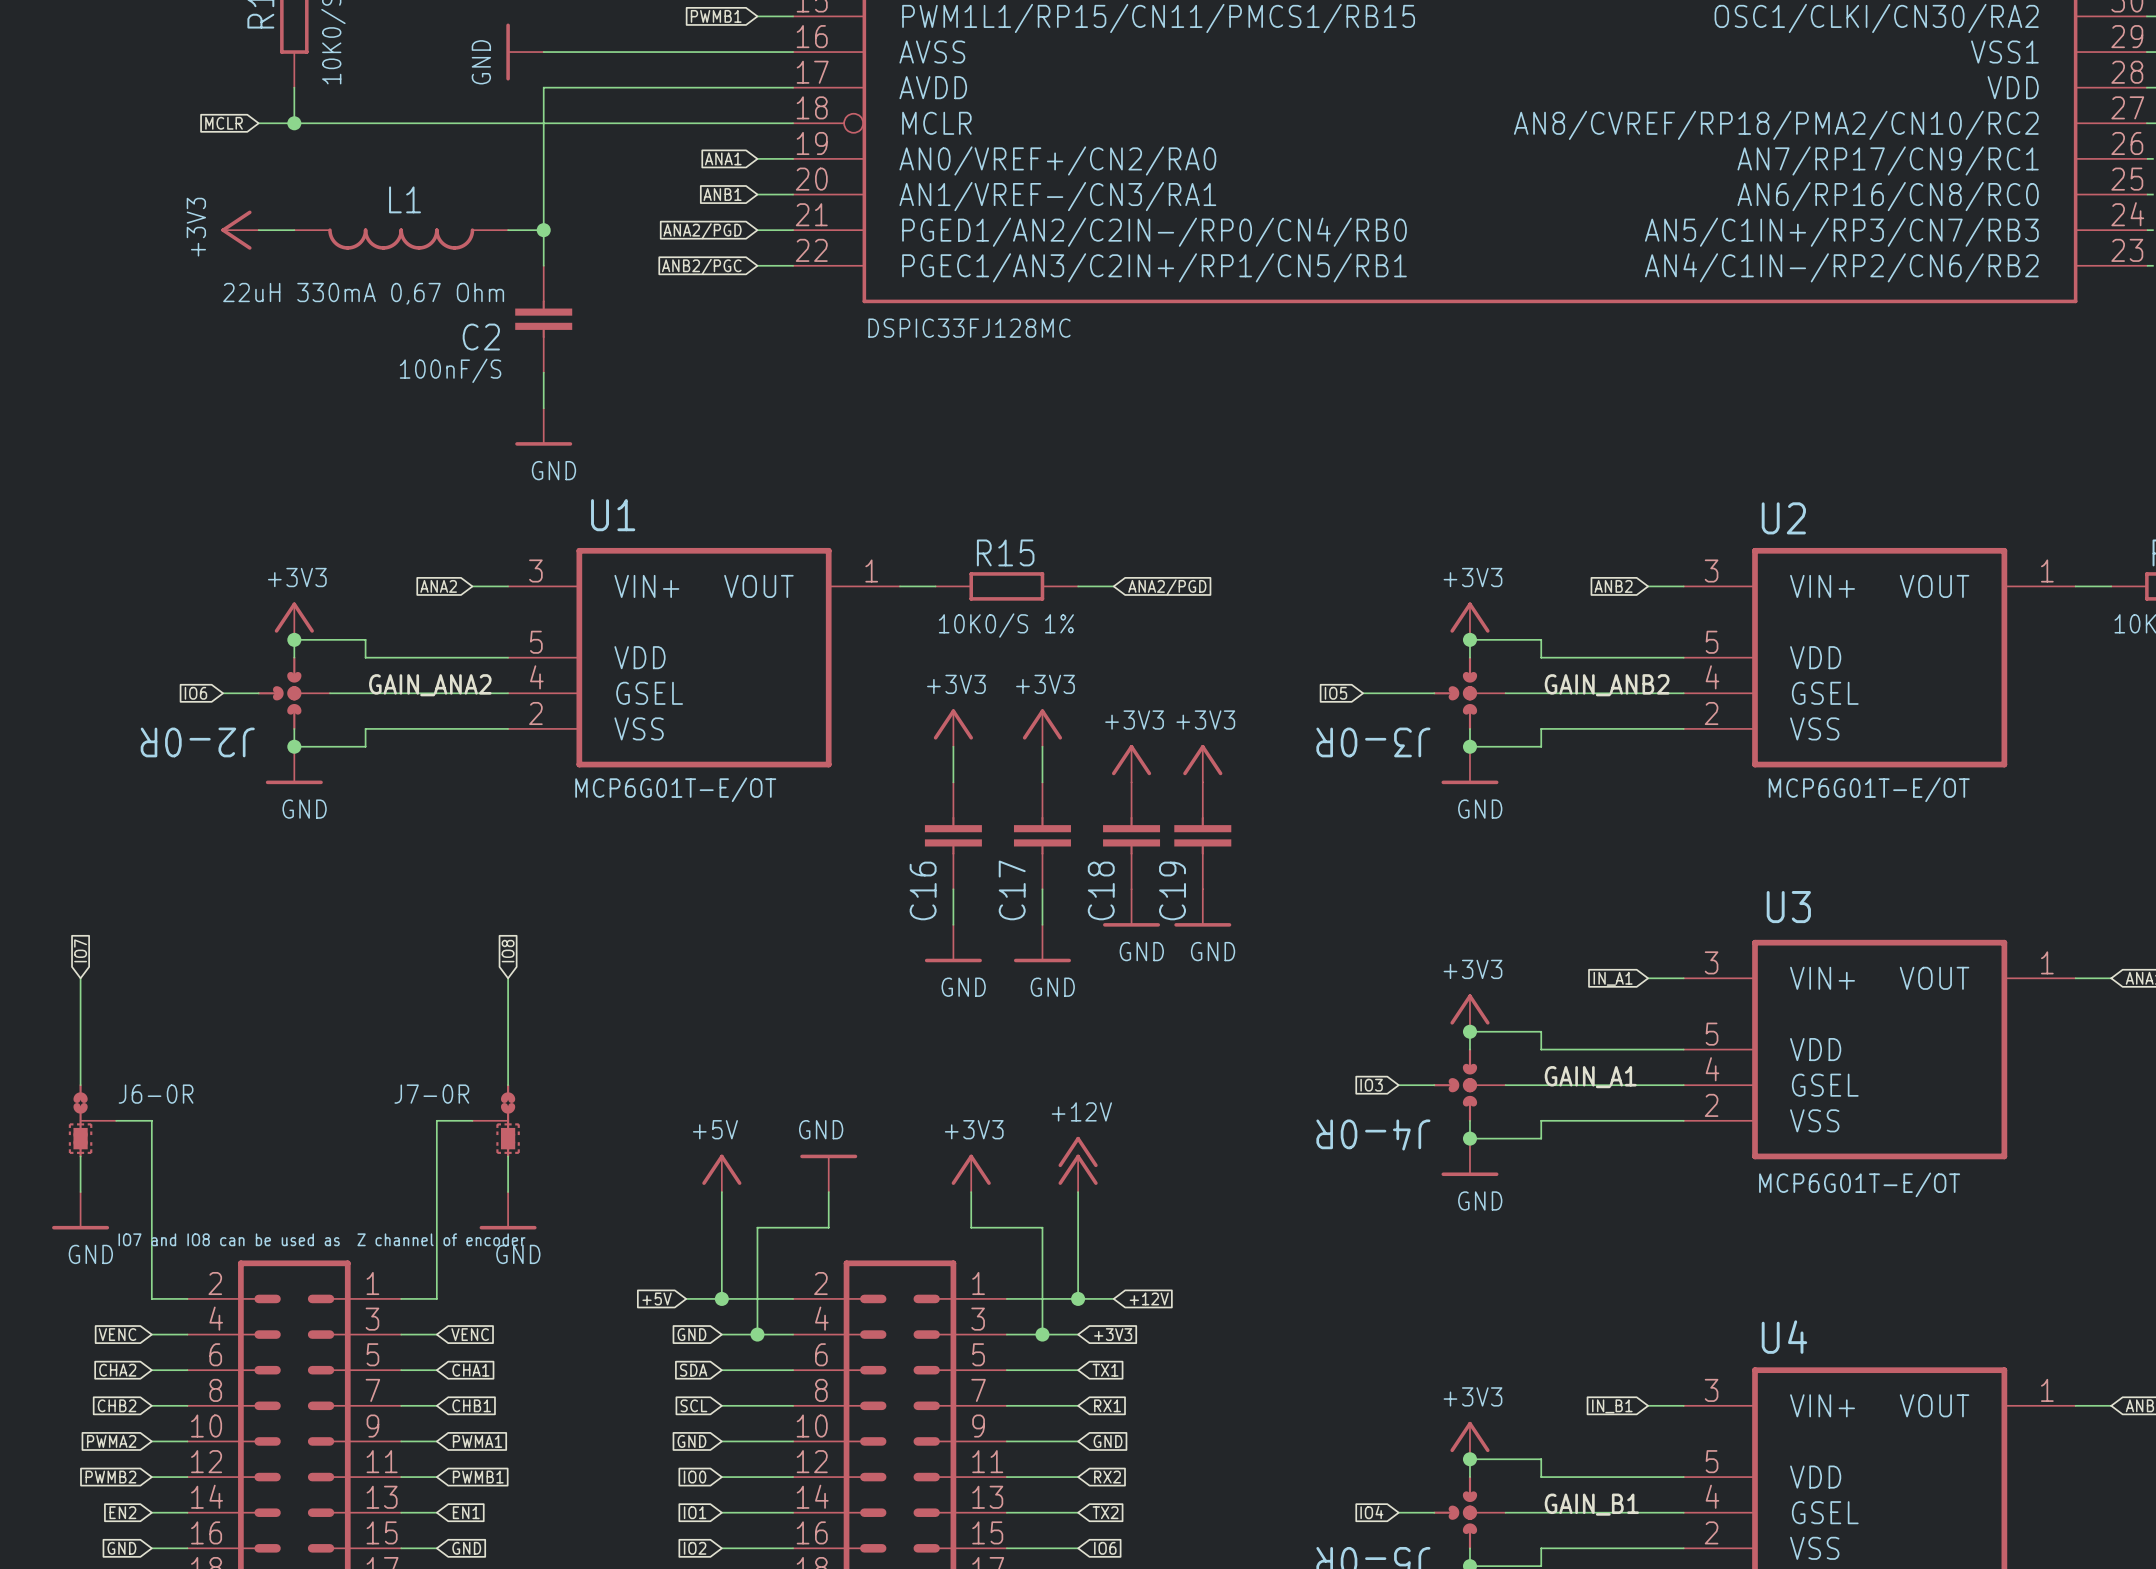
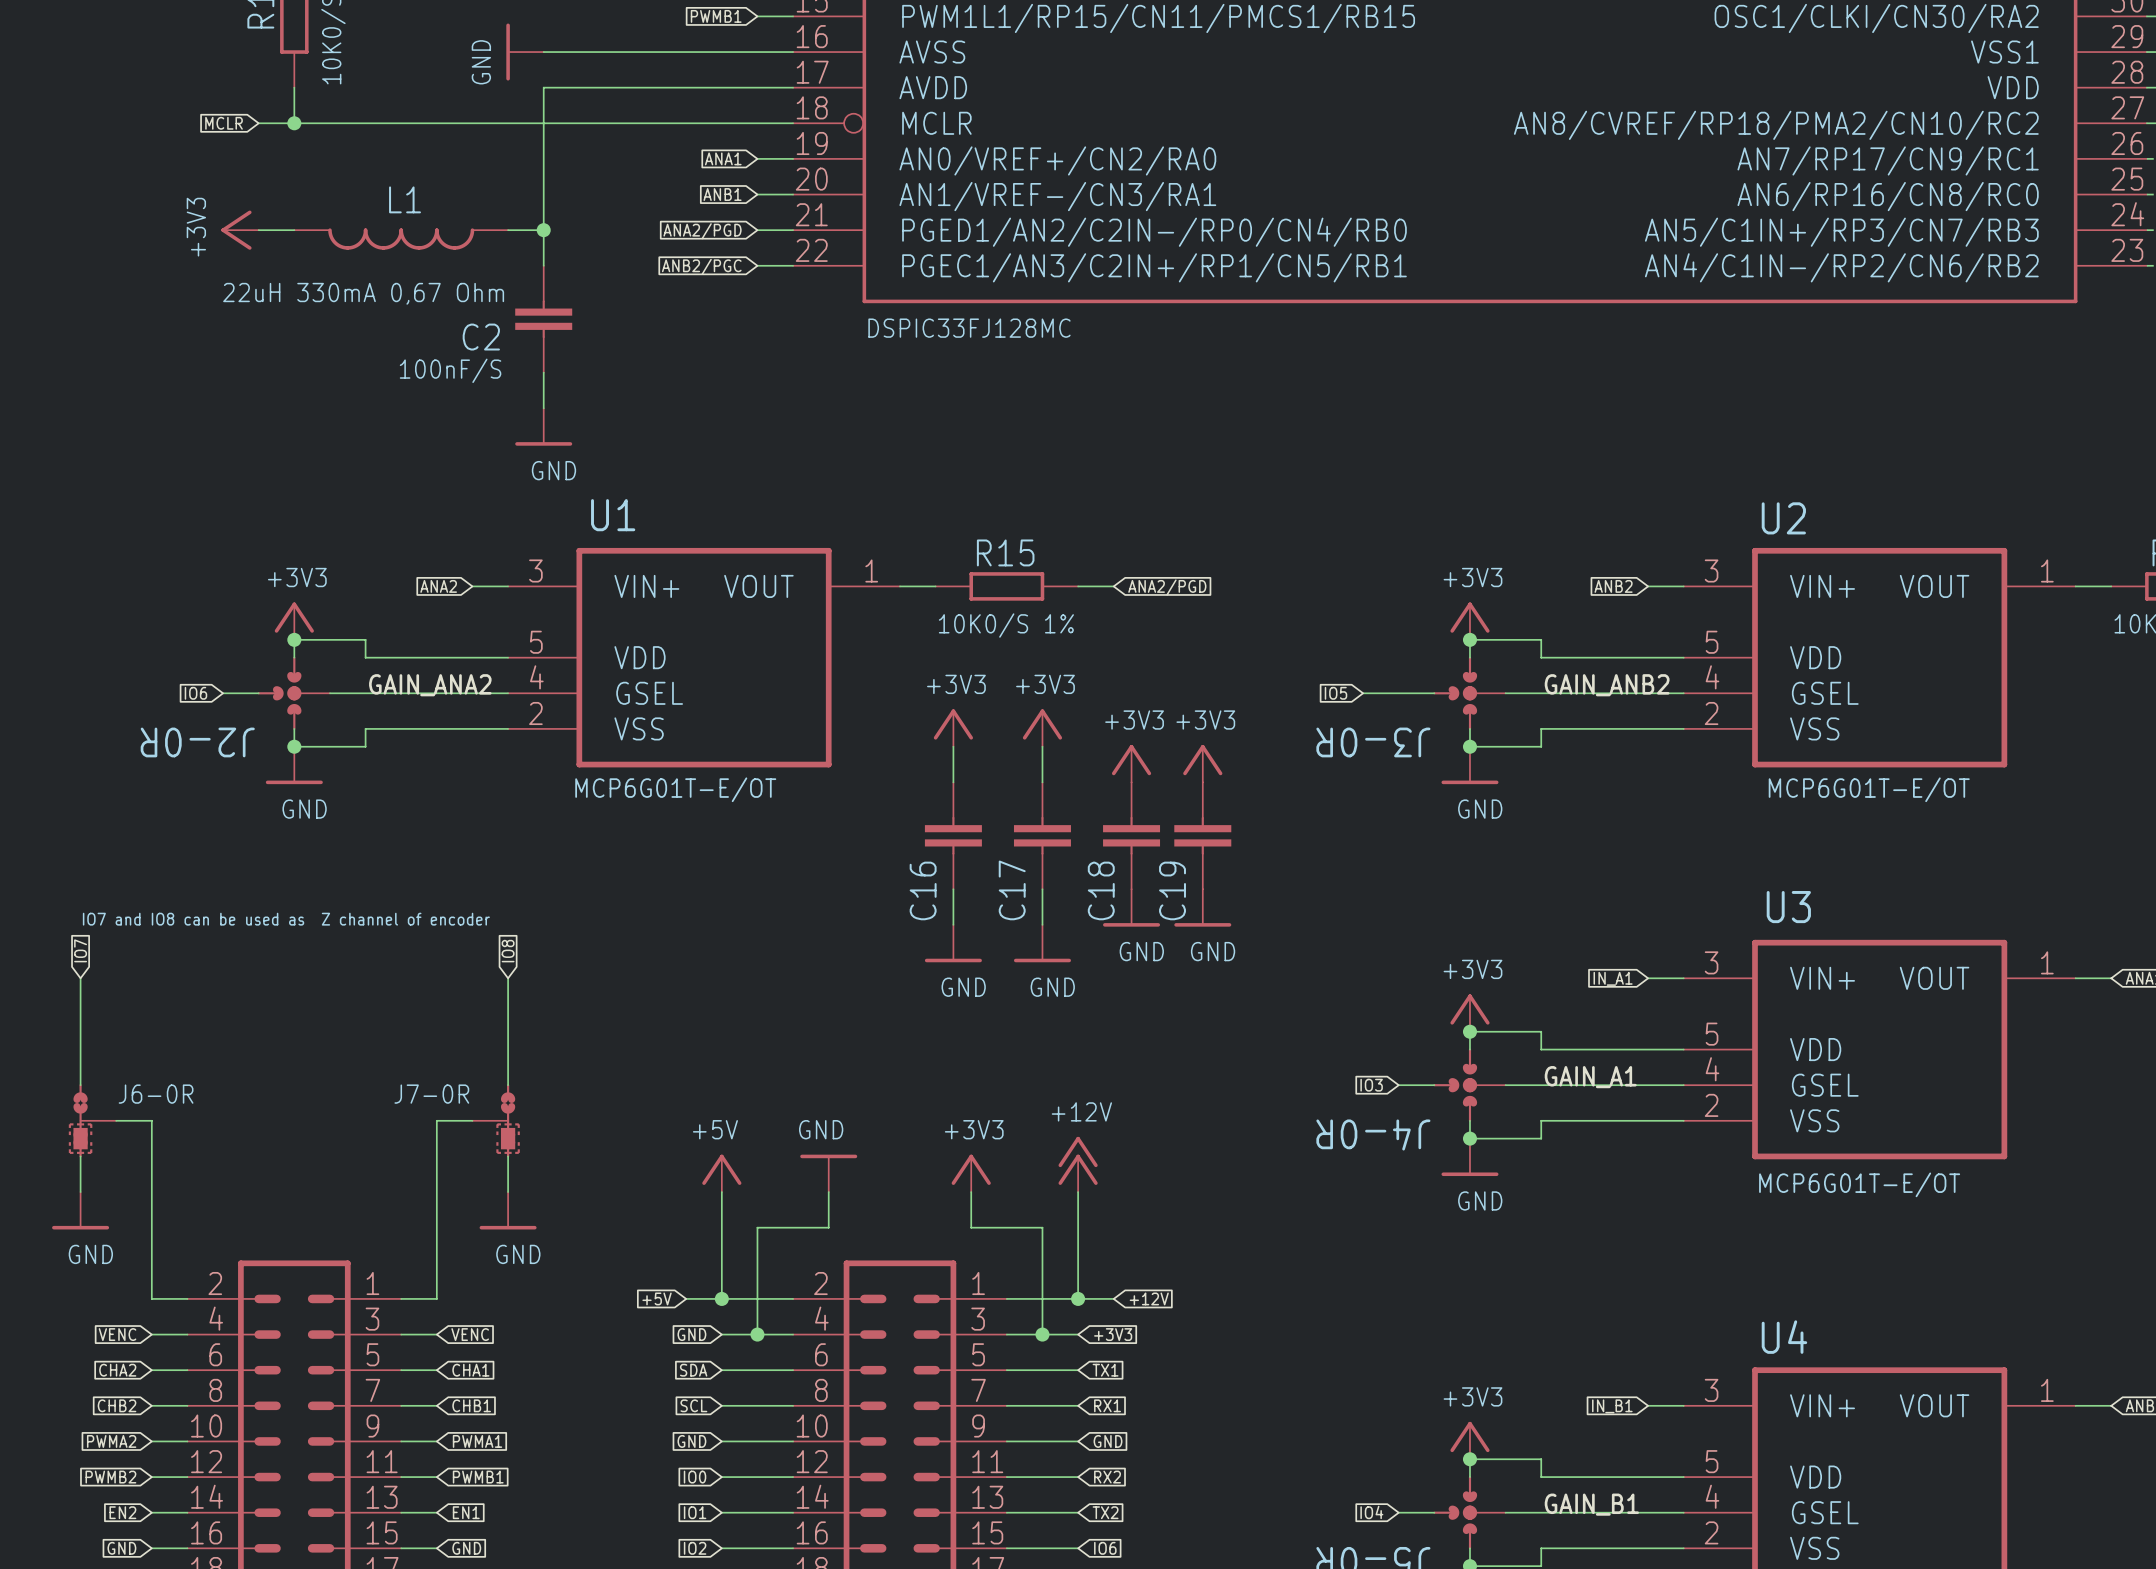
text position: IO7 and IO8 can be used as Z channel of encoder (322, 1239) -> IO7 and IO8 can be used as Z channel of encoder (286, 919)

